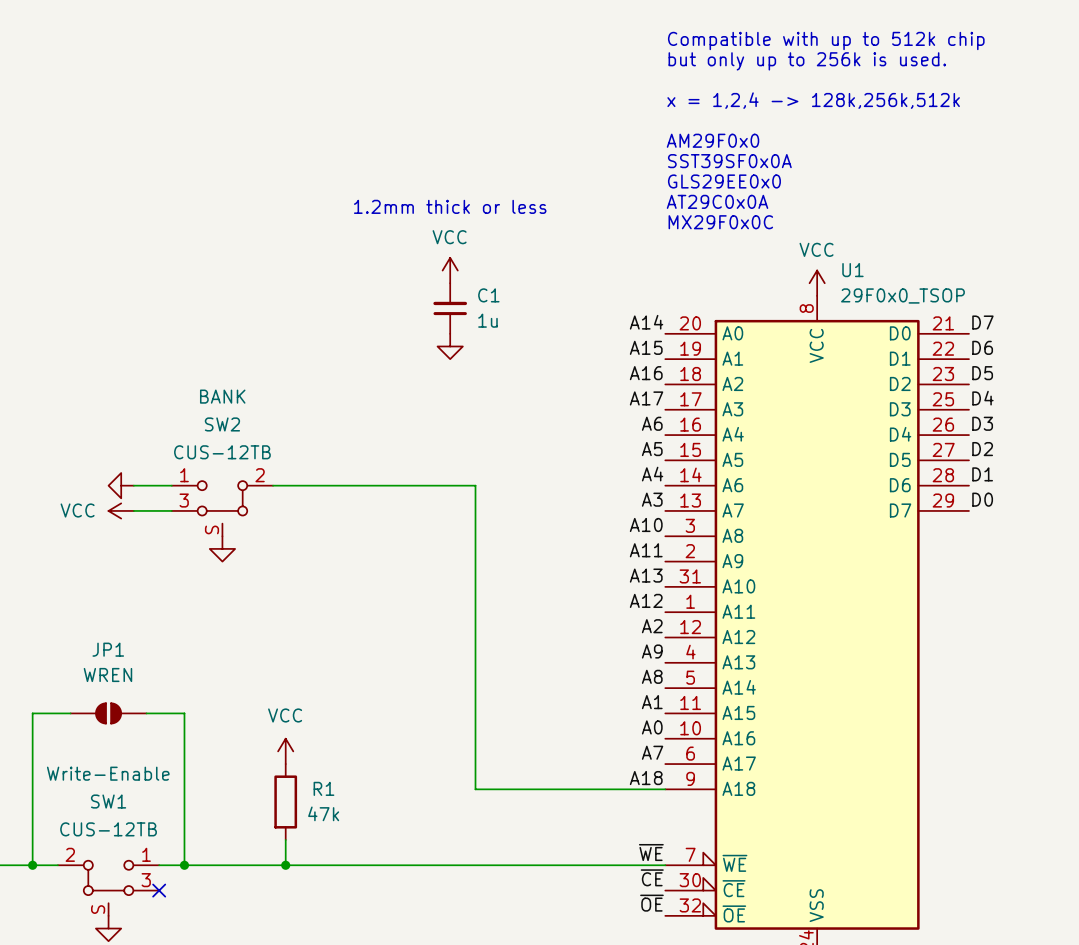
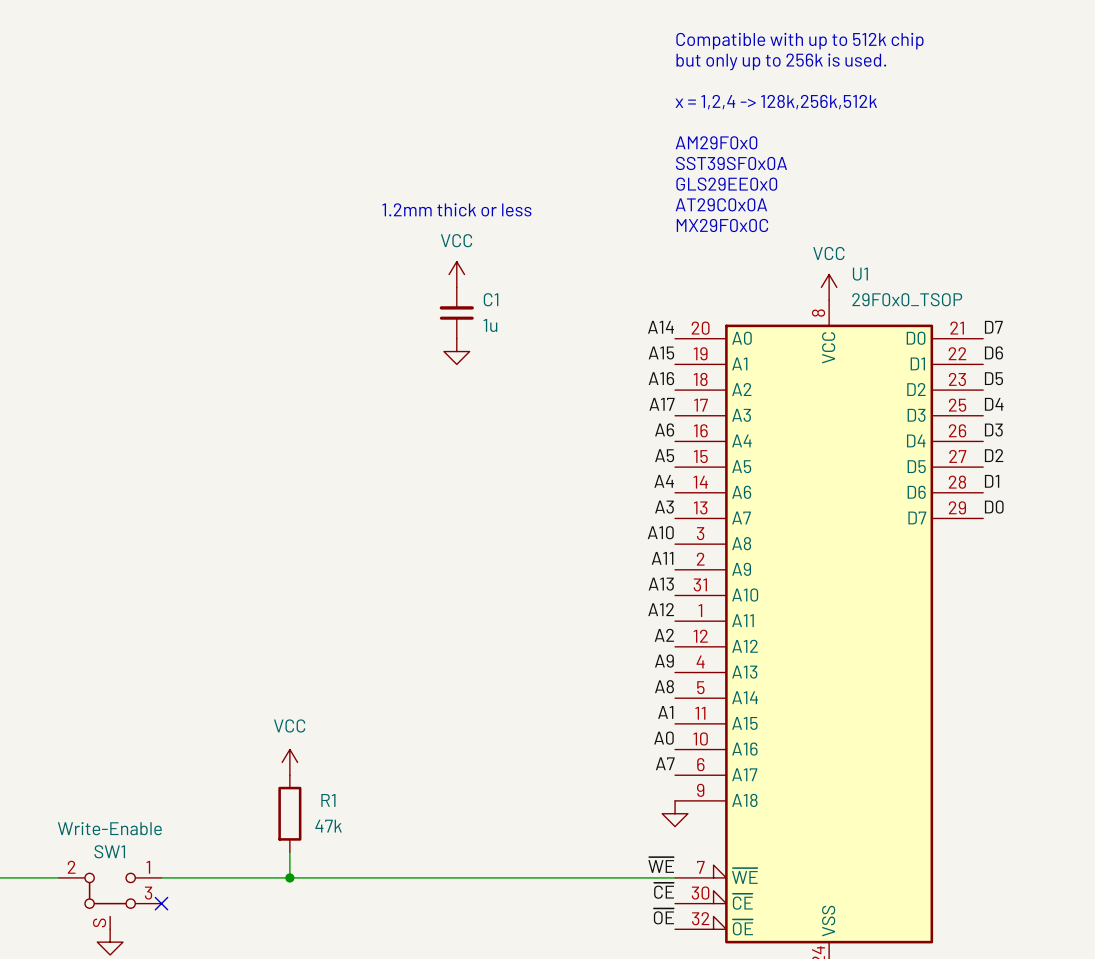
power symbol: (121, 485) -> none
wire: (133, 485) (171, 485) -> none
wire: (273, 485) (475, 485) (475, 789) (665, 789) -> none
SW2: CUS-12TB (222, 508) -> none
power symbol: VCC (121, 510) -> none
wire: (133, 510) (171, 510) -> none
power symbol: (222, 548) -> none
wire: (70, 713) (32, 713) (32, 865) -> none
JP1: WREN (108, 713) -> none
wire: (146, 713) (184, 713) (184, 865) -> none
SW1 text: Write-Enable (108, 773) -> none
label: A18 (646, 778) -> none
SW1 name position: SW1 (108, 801) -> SW1 (109, 851)
power symbol: none -> (675, 813)
SW1 value: CUS-12TB (108, 829) -> Write-Enable (109, 828)
junction: (32, 865) -> none
junction: (184, 865) -> none

